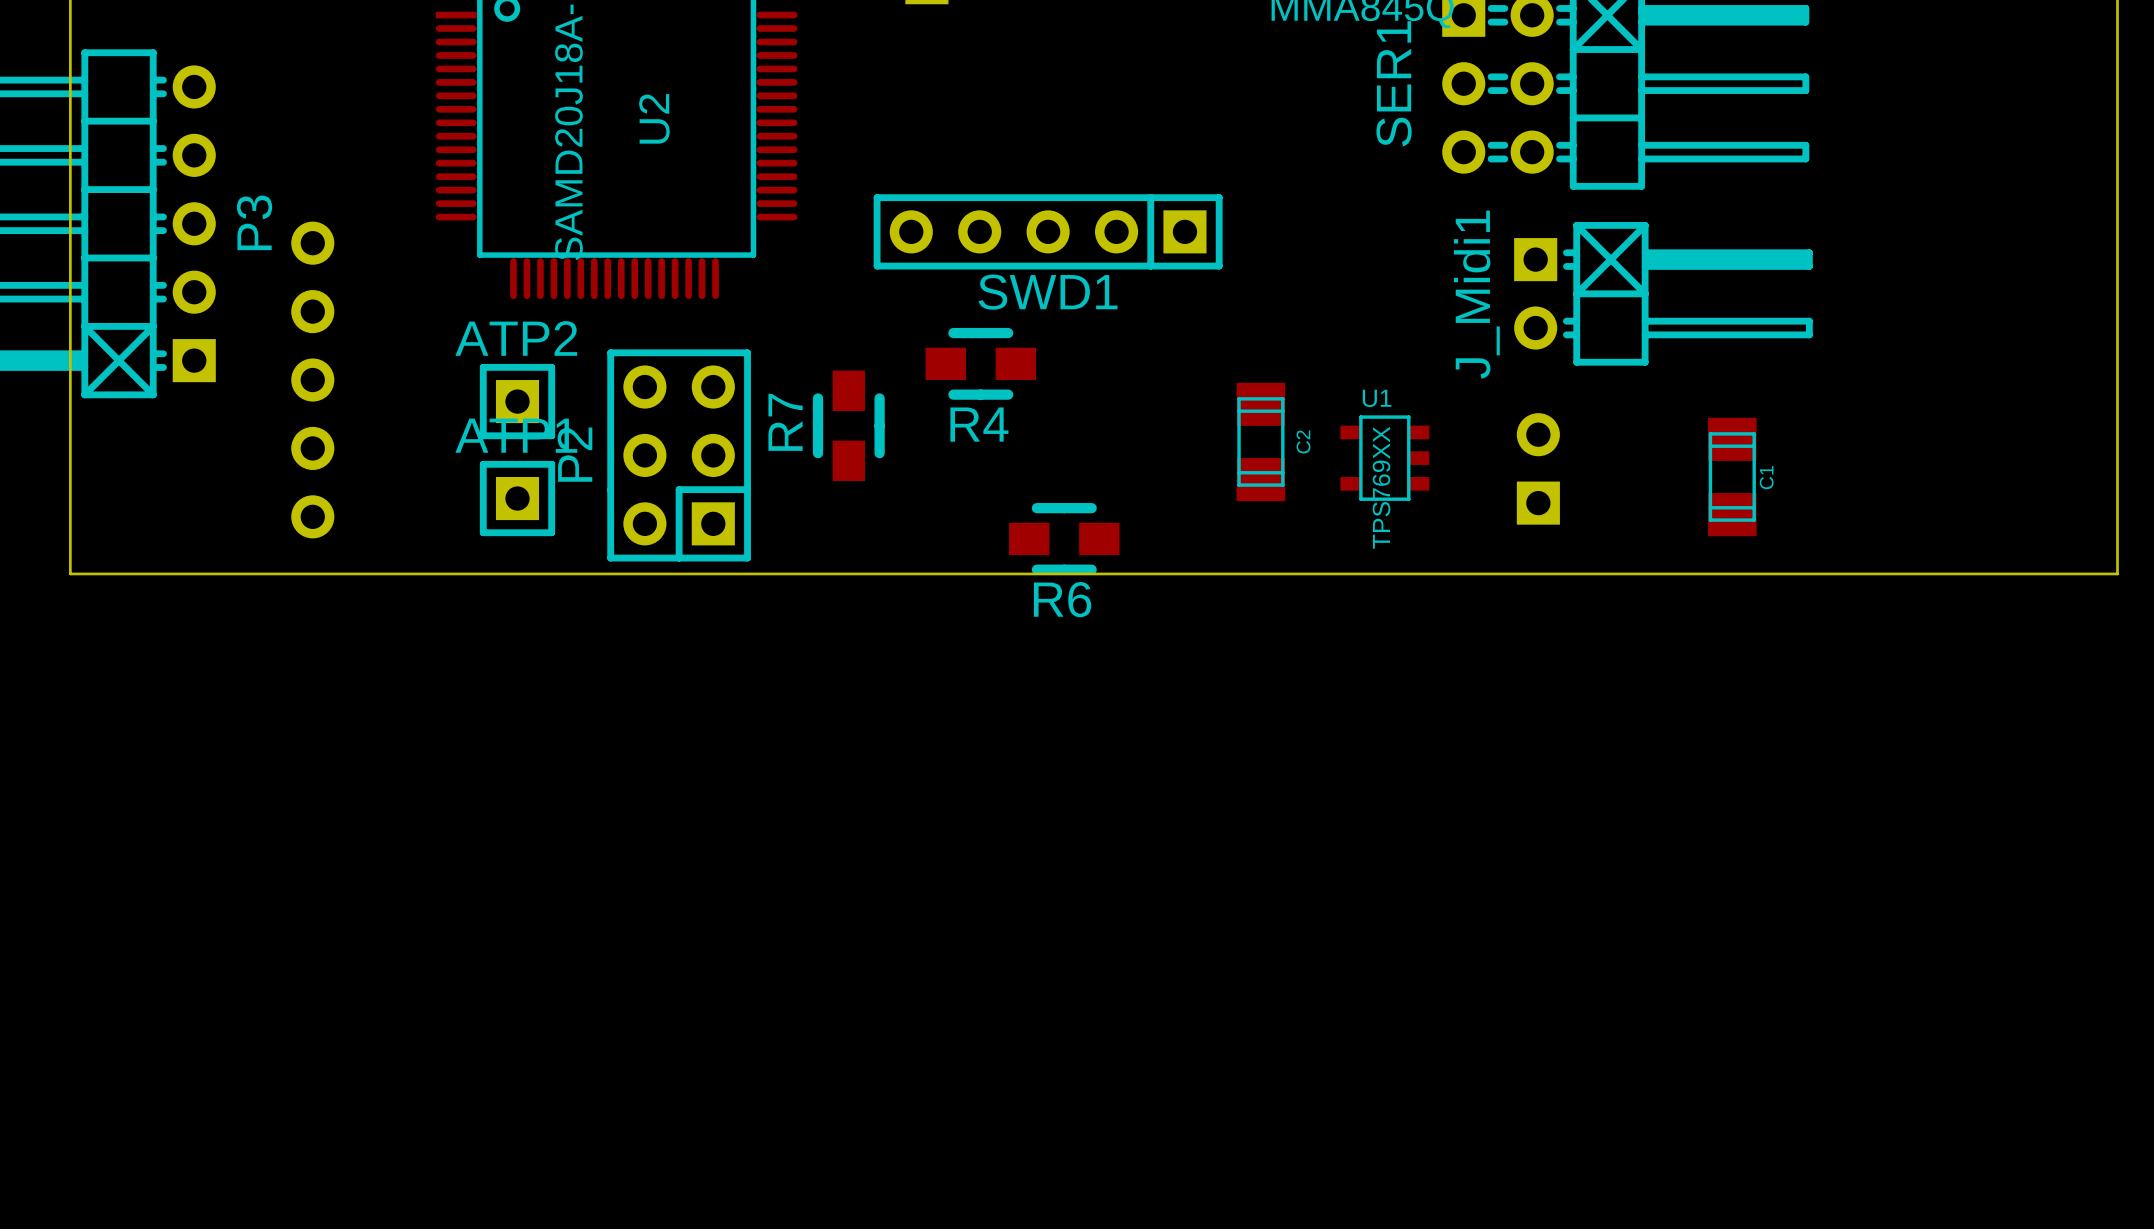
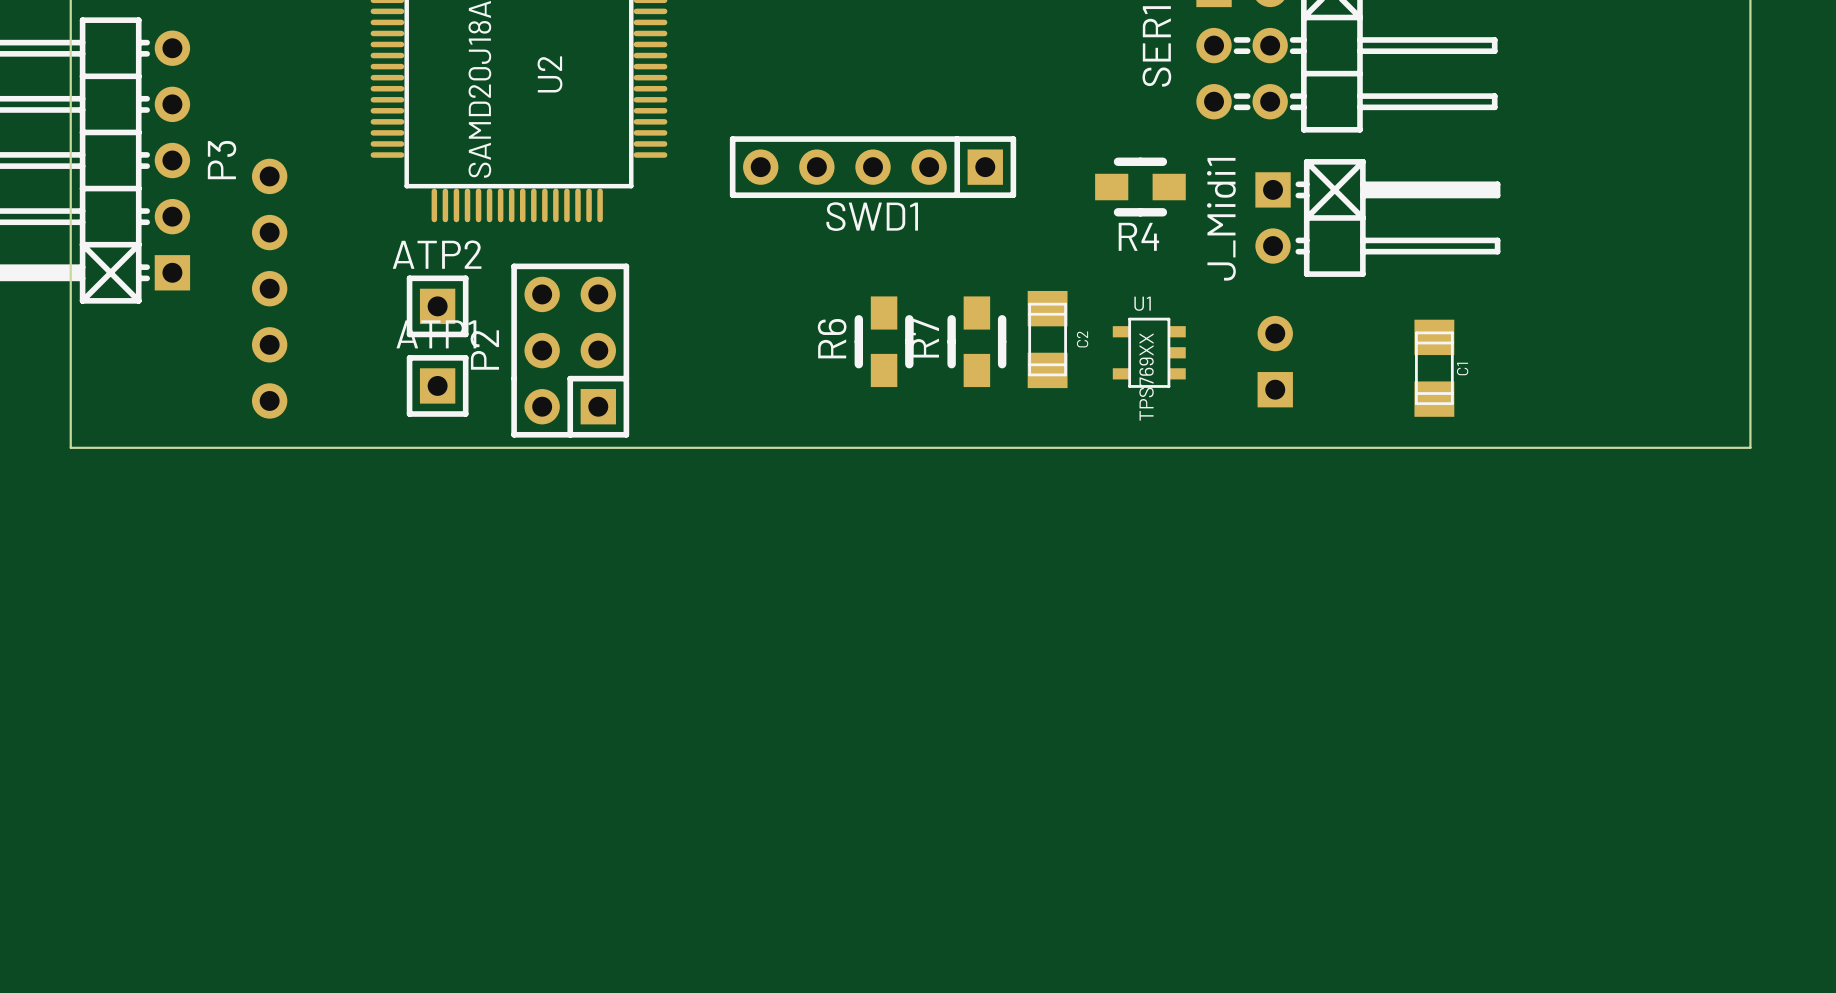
R4 position: (980, 363) -> (1140, 187)
R7 position: (848, 425) -> (976, 341)
R6 rotation: 0° (1064, 538) -> 90° clockwise (884, 341)
R6 position: (1064, 538) -> (884, 341)

